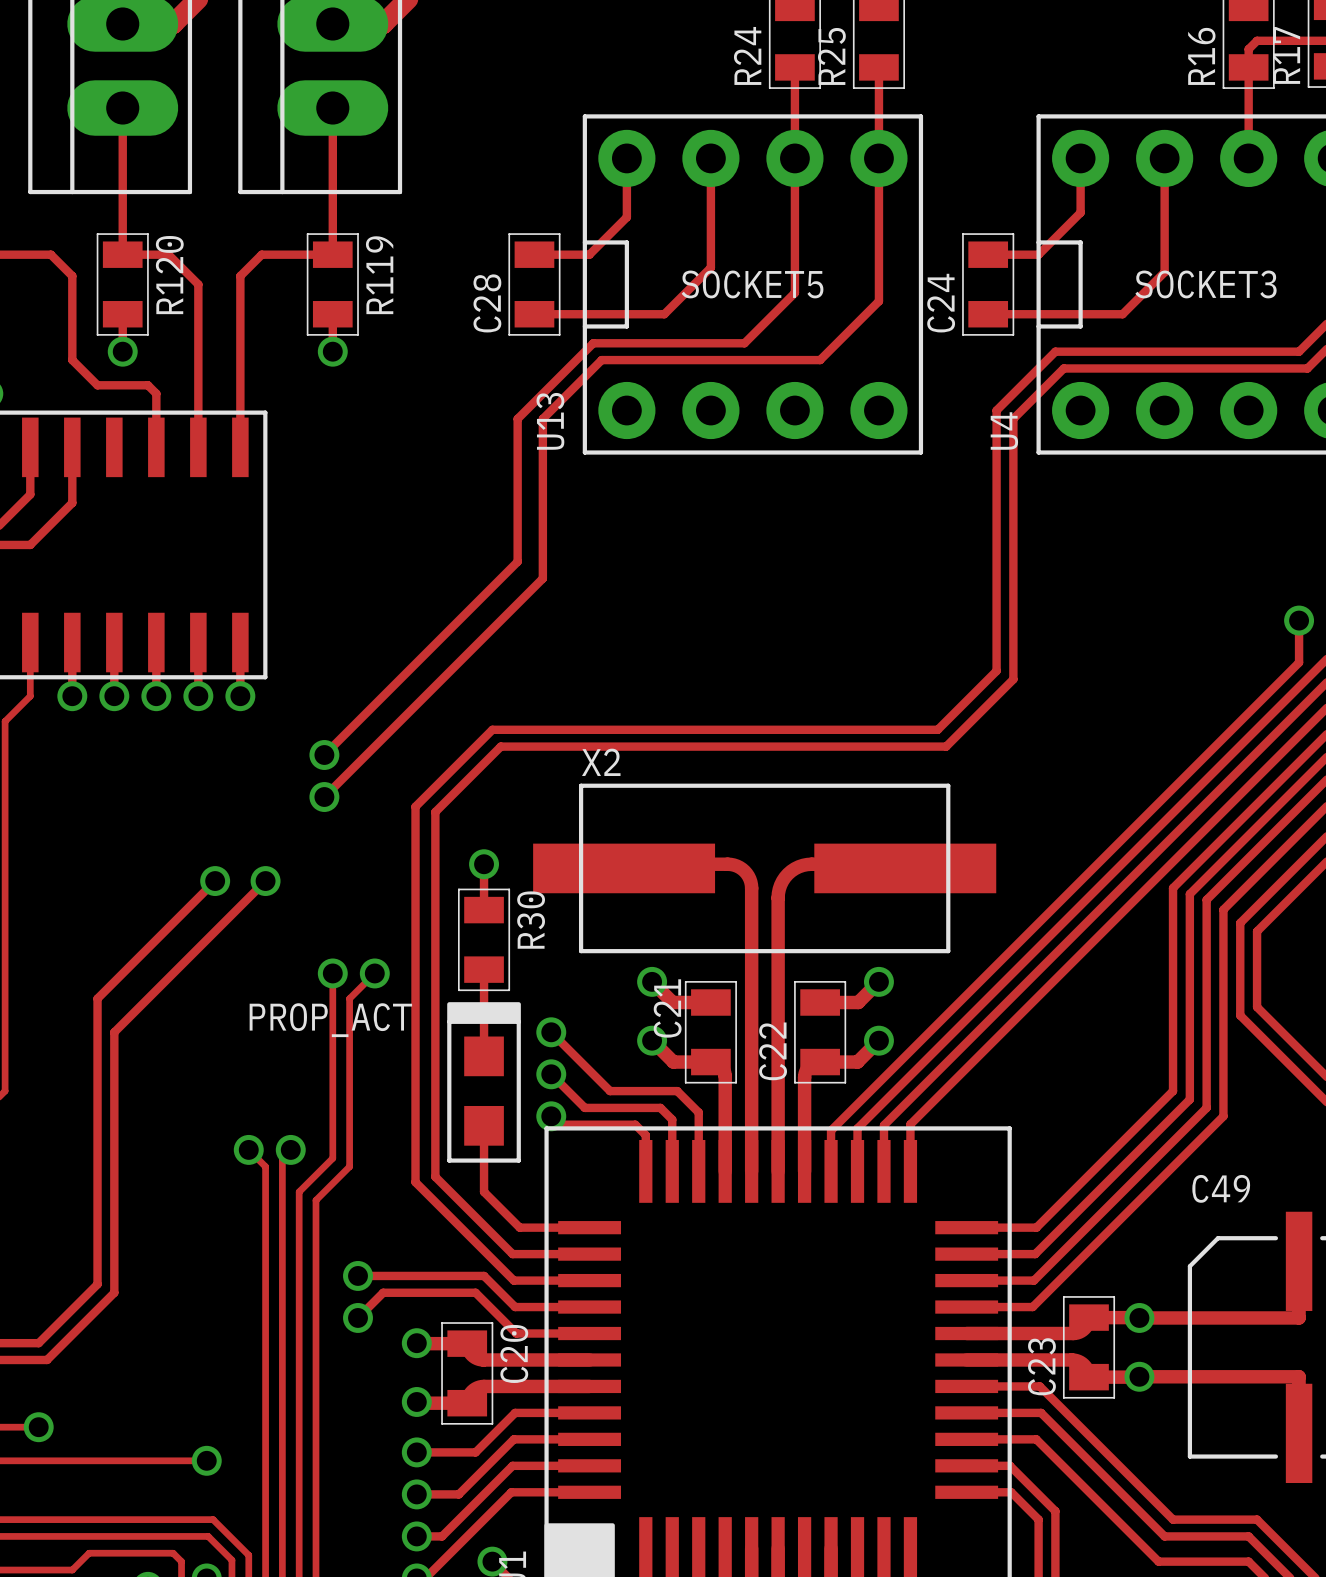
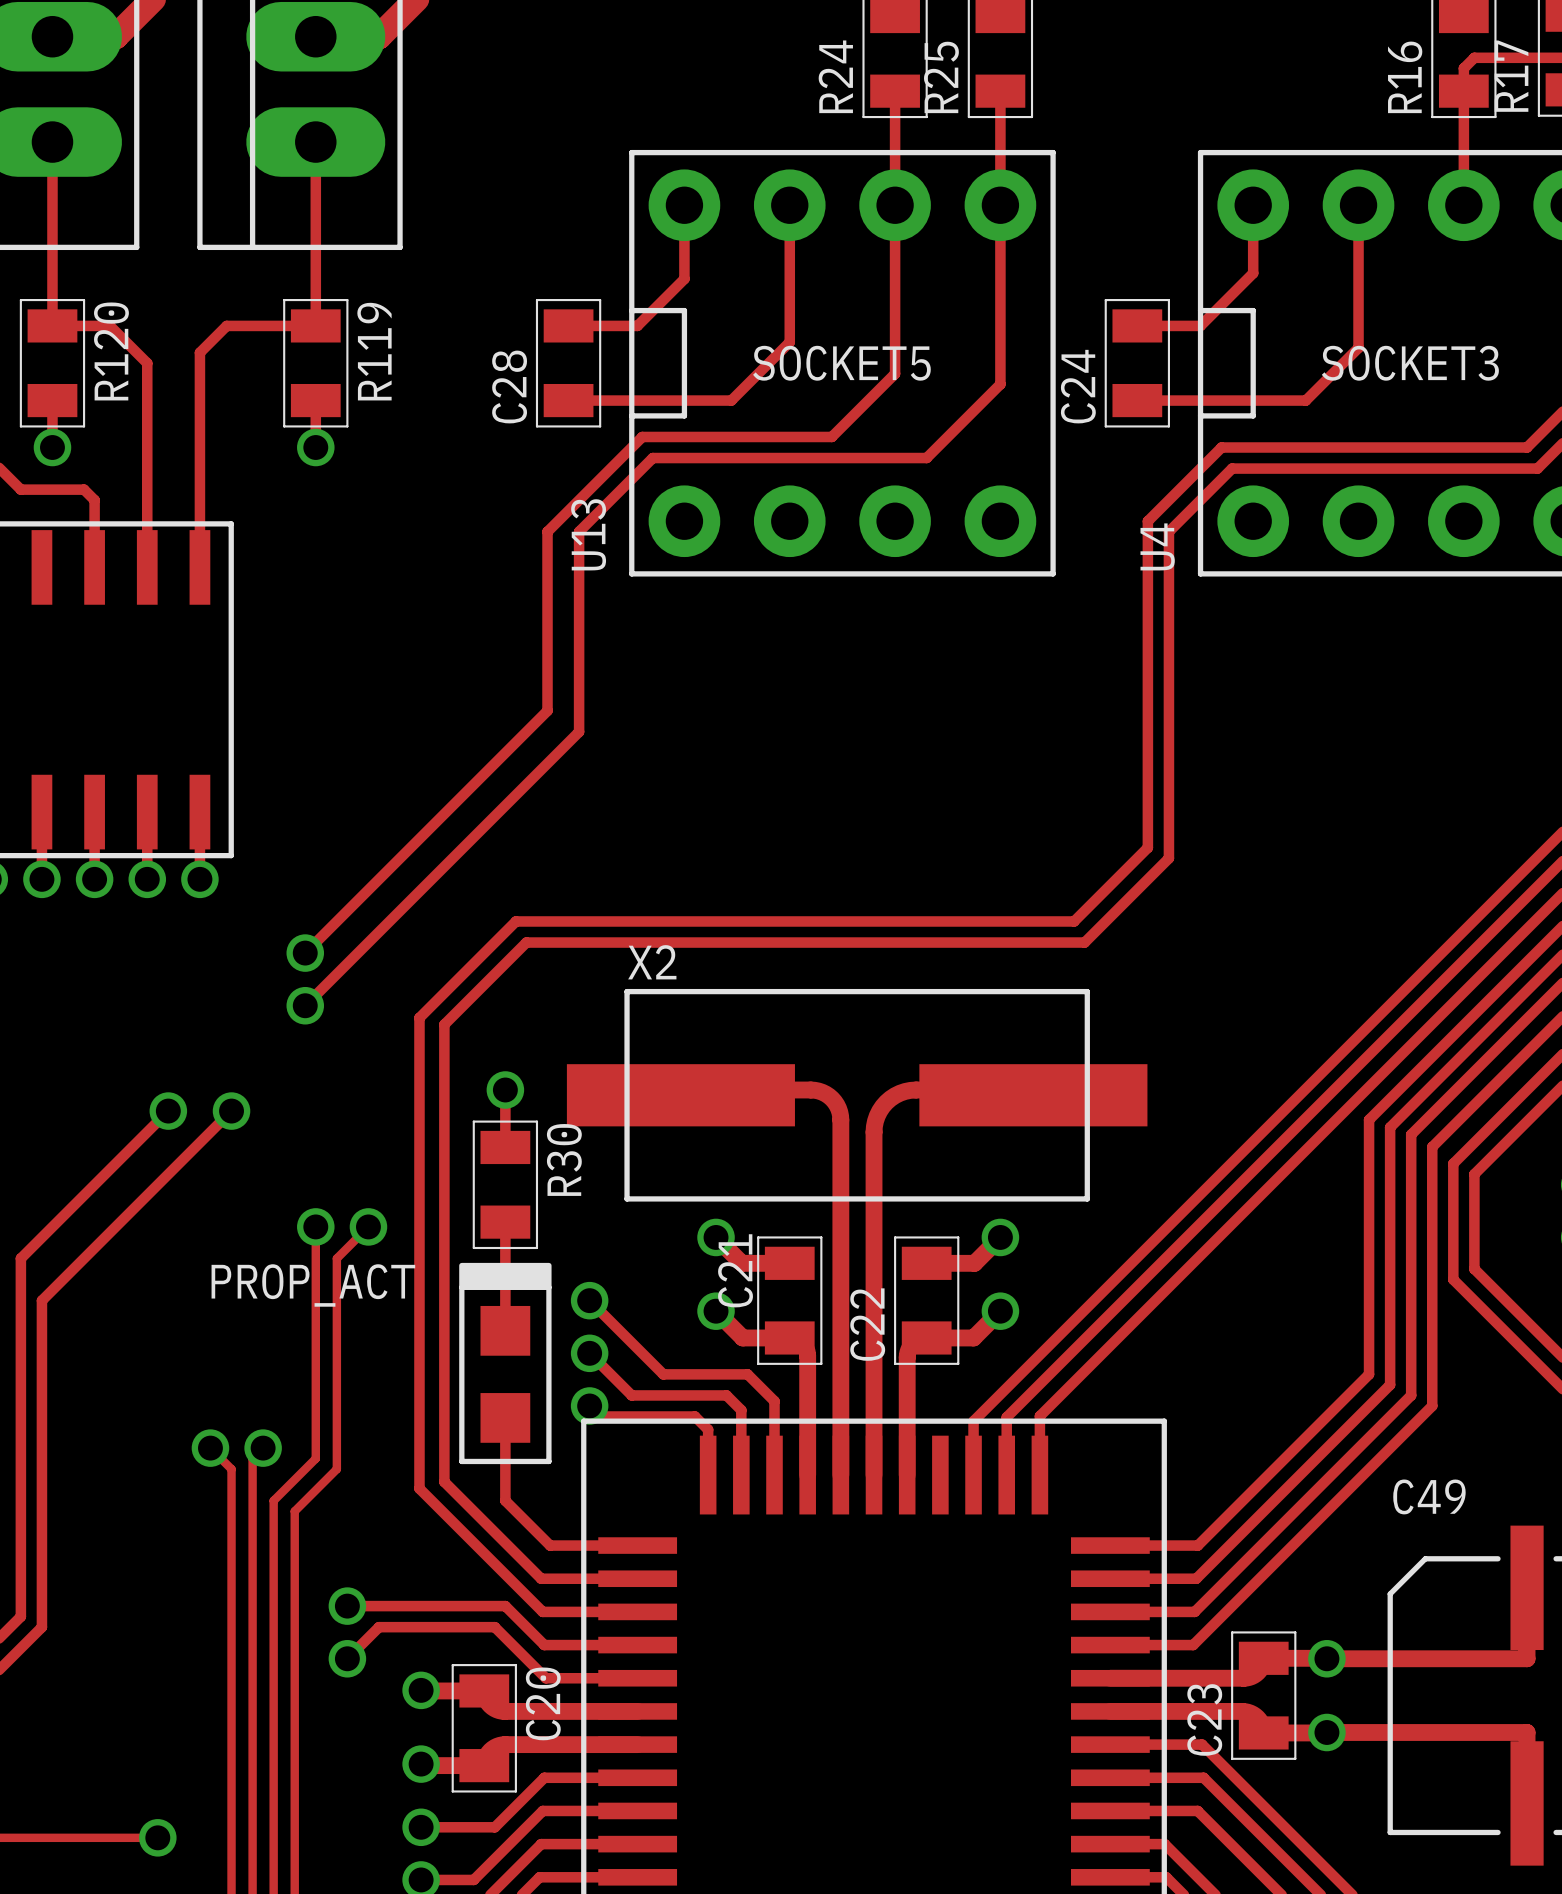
track: (1299, 620) (1299, 662) (831, 1130) (831, 1171) -> none
via: (1299, 620) -> none

